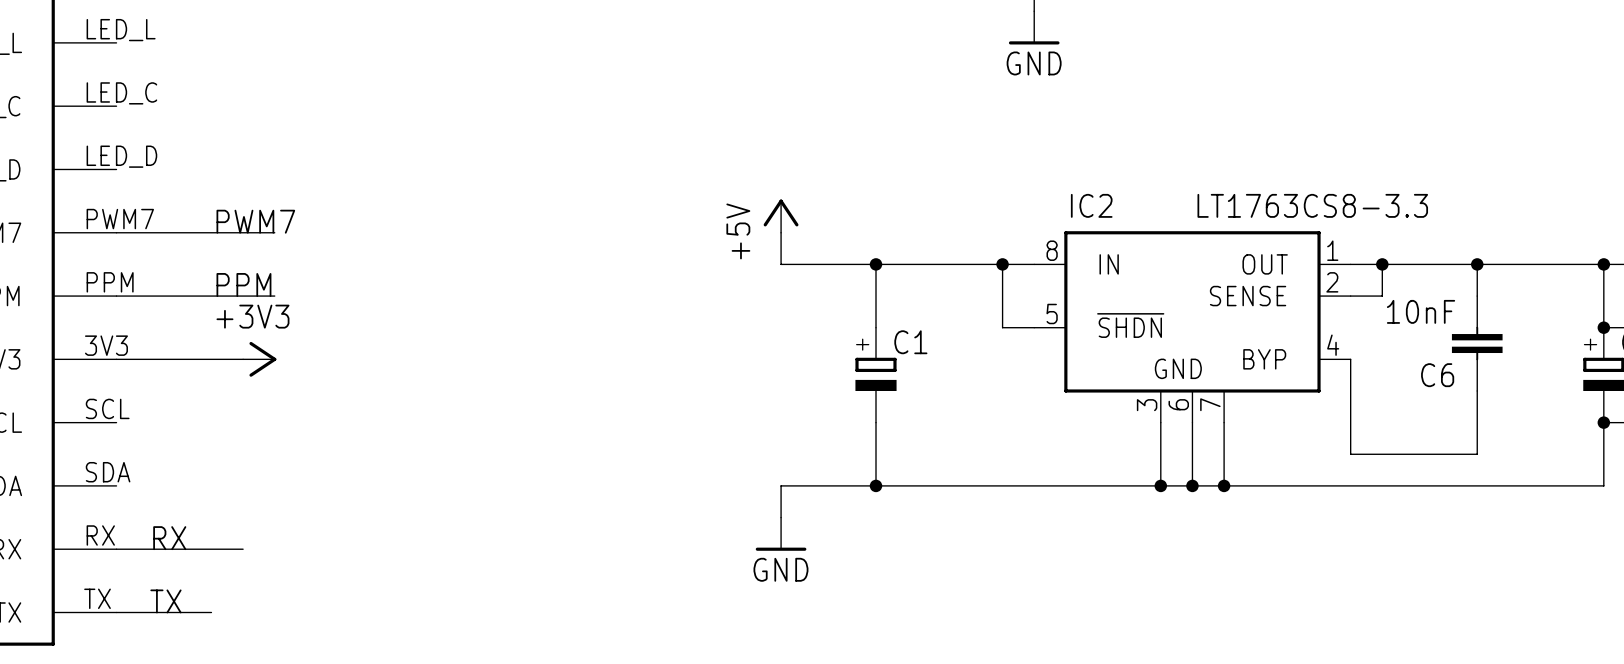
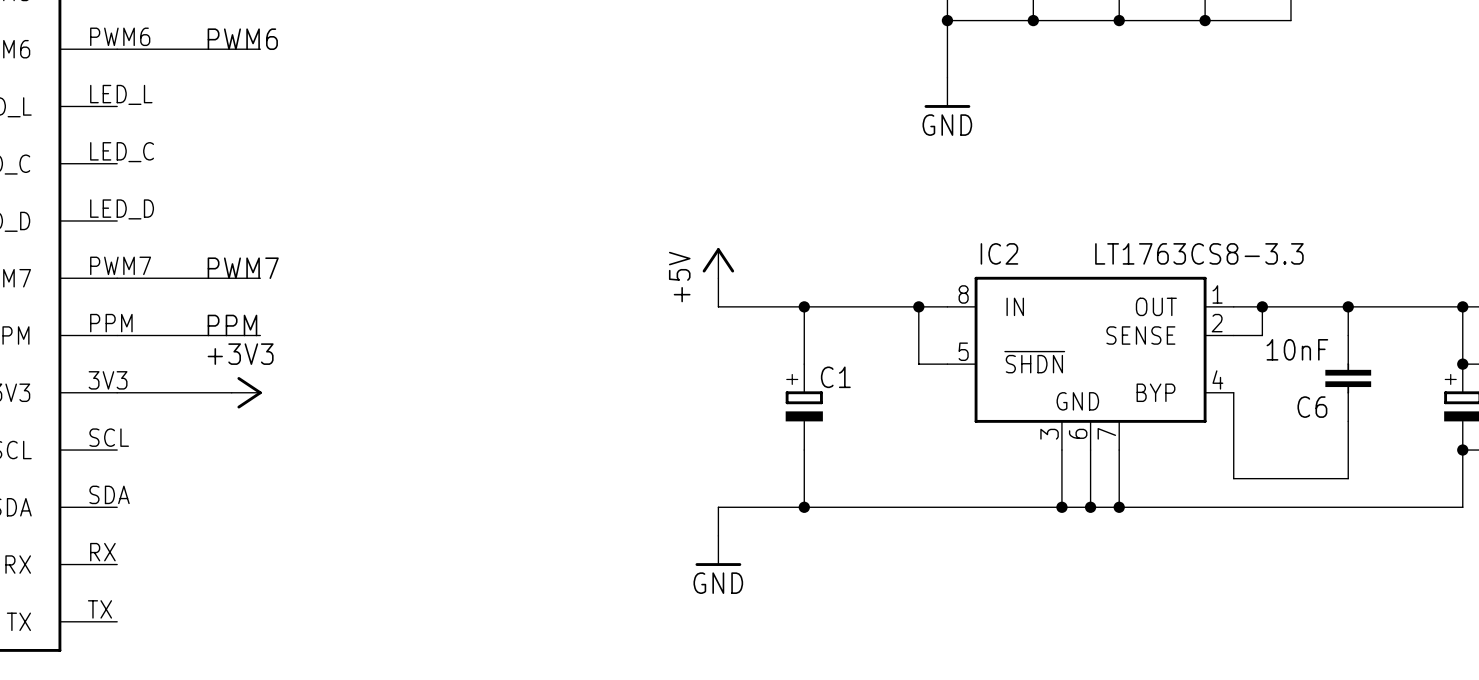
label: RX (169, 538) -> none
wire: (116, 549) (243, 549) -> none
label: TX (165, 601) -> none
wire: (116, 612) (211, 612) -> none

